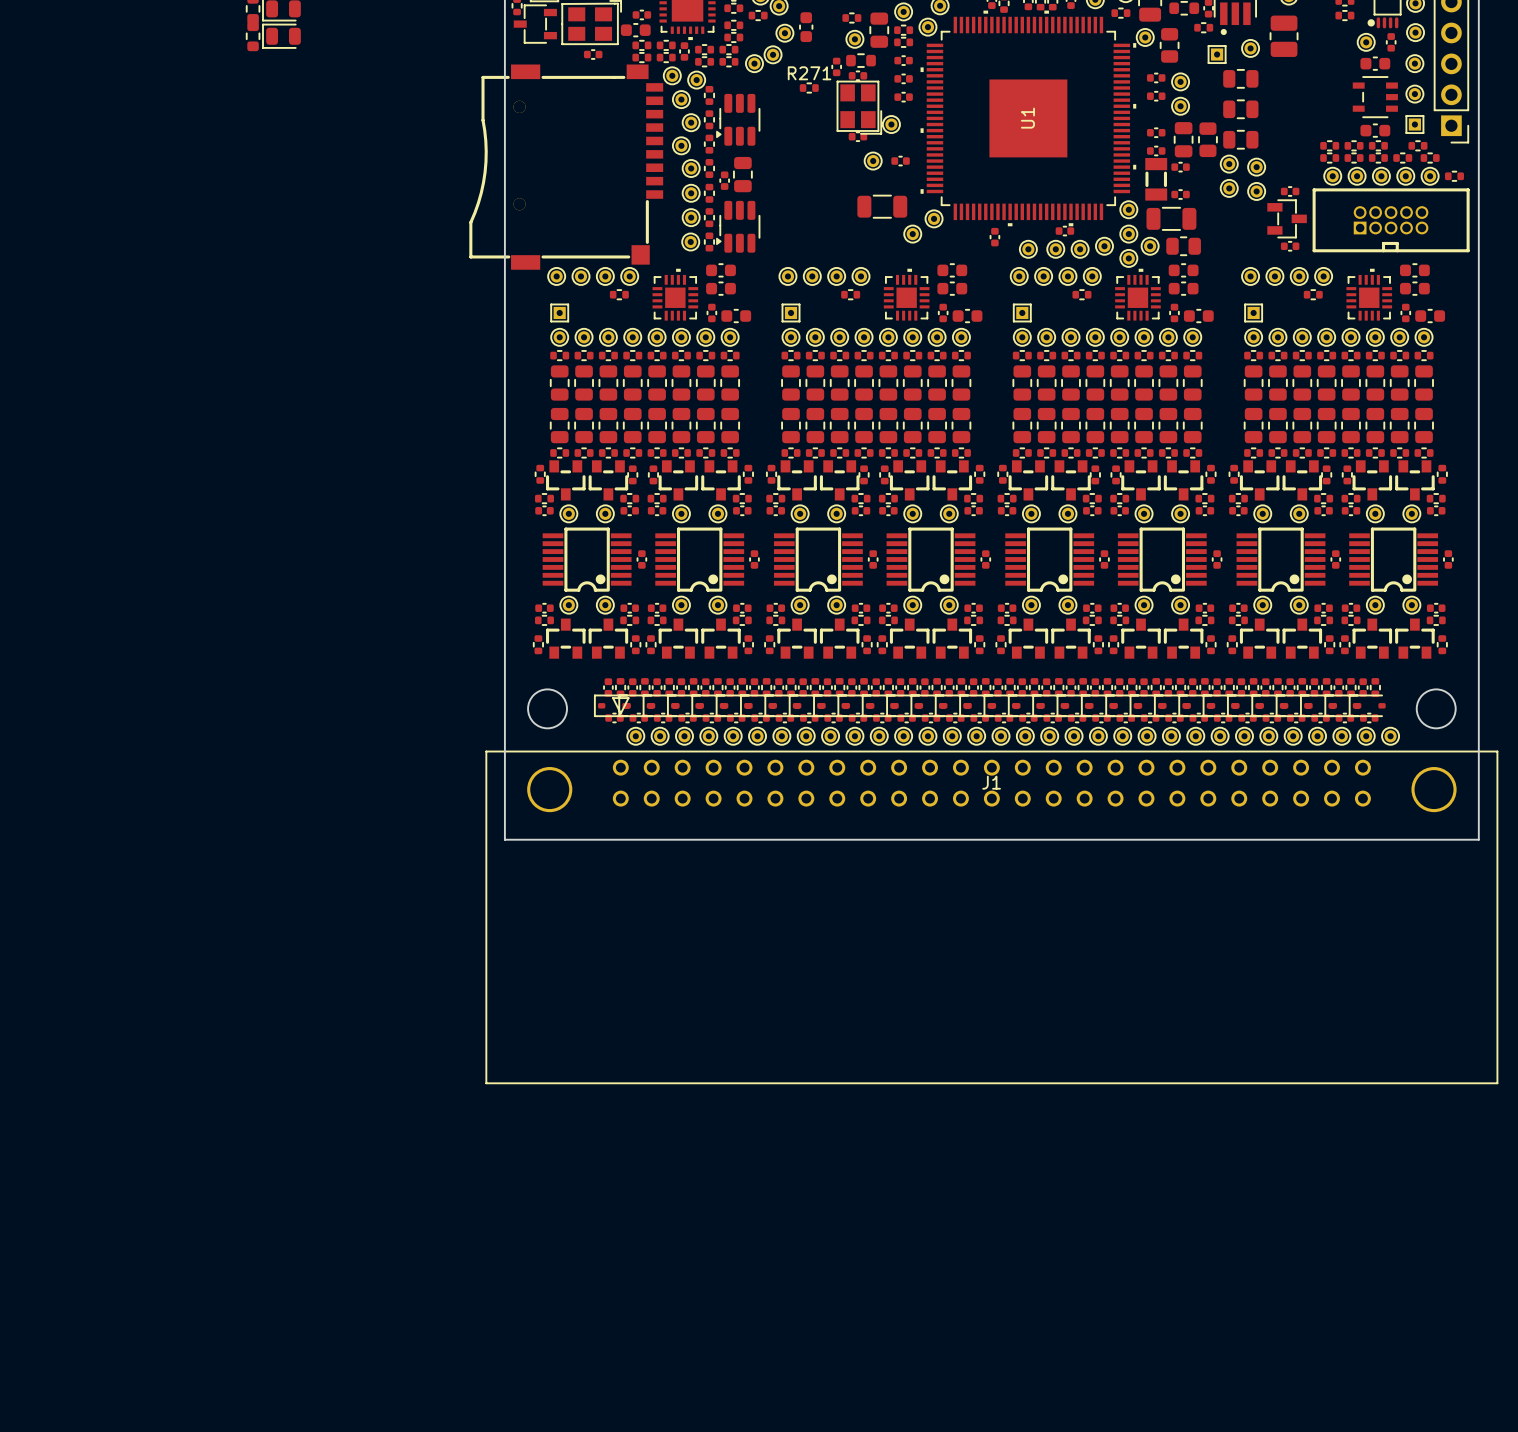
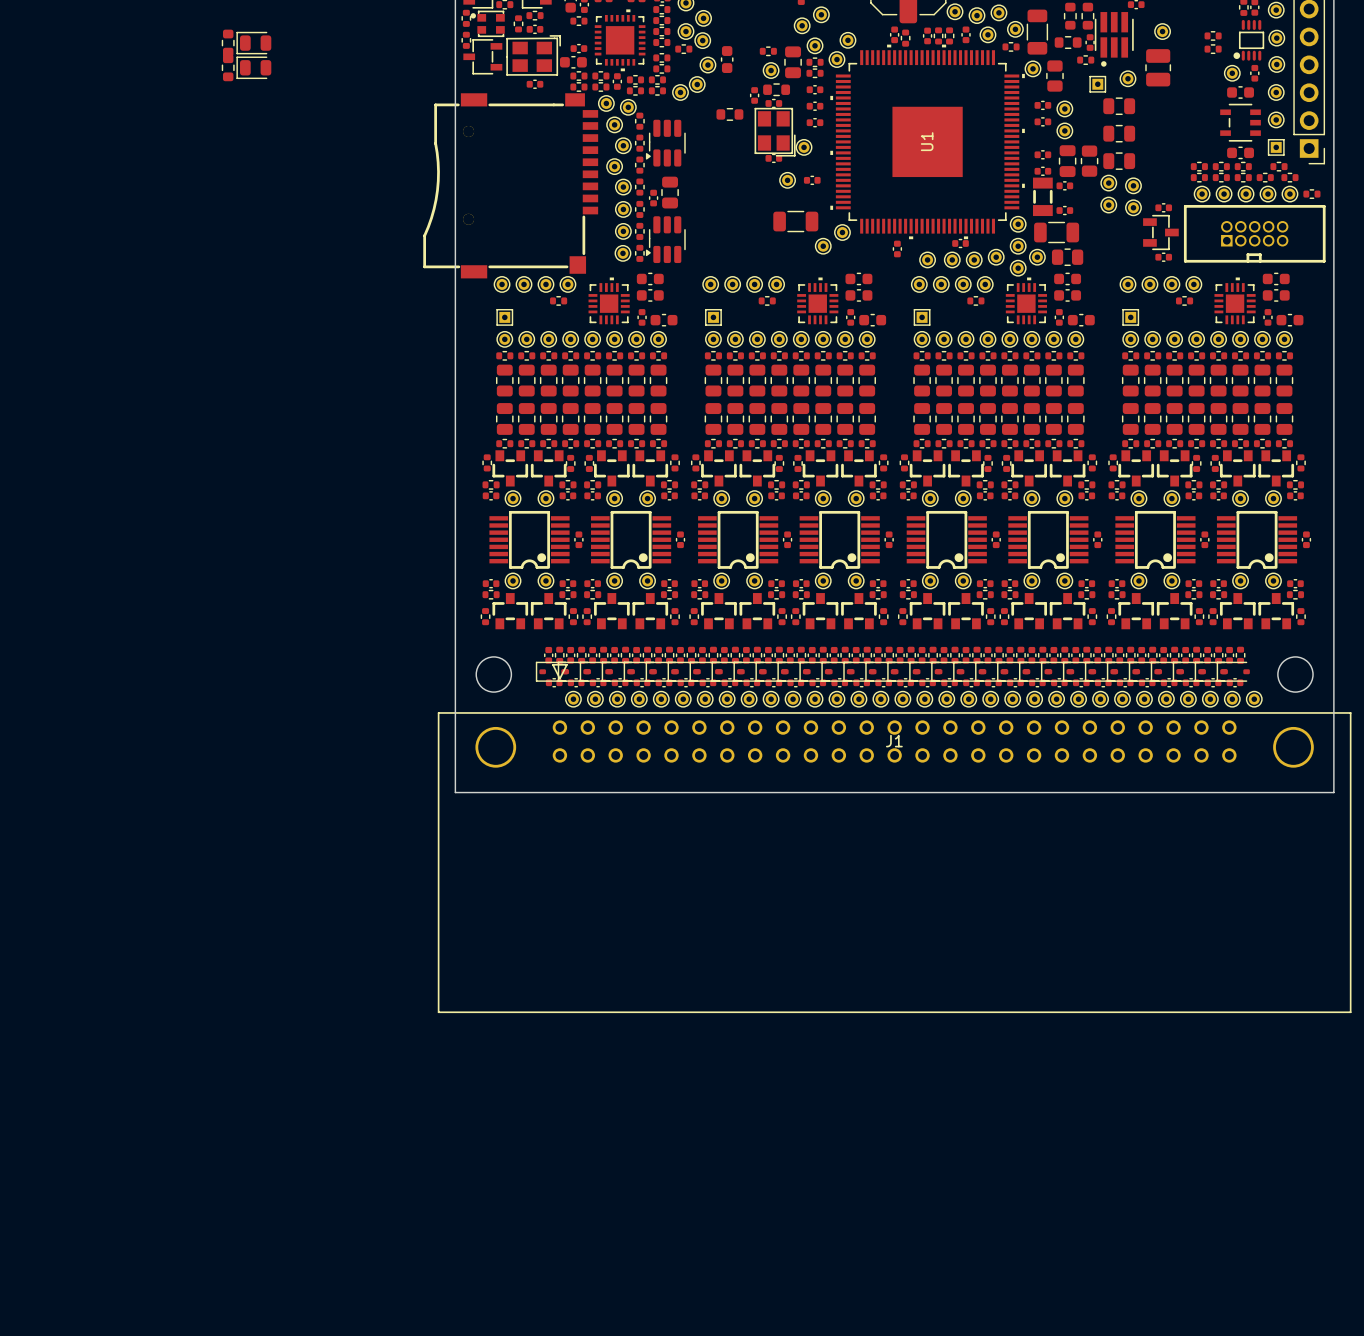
R271: (809, 88) -> none
part: none -> (729, 114)

